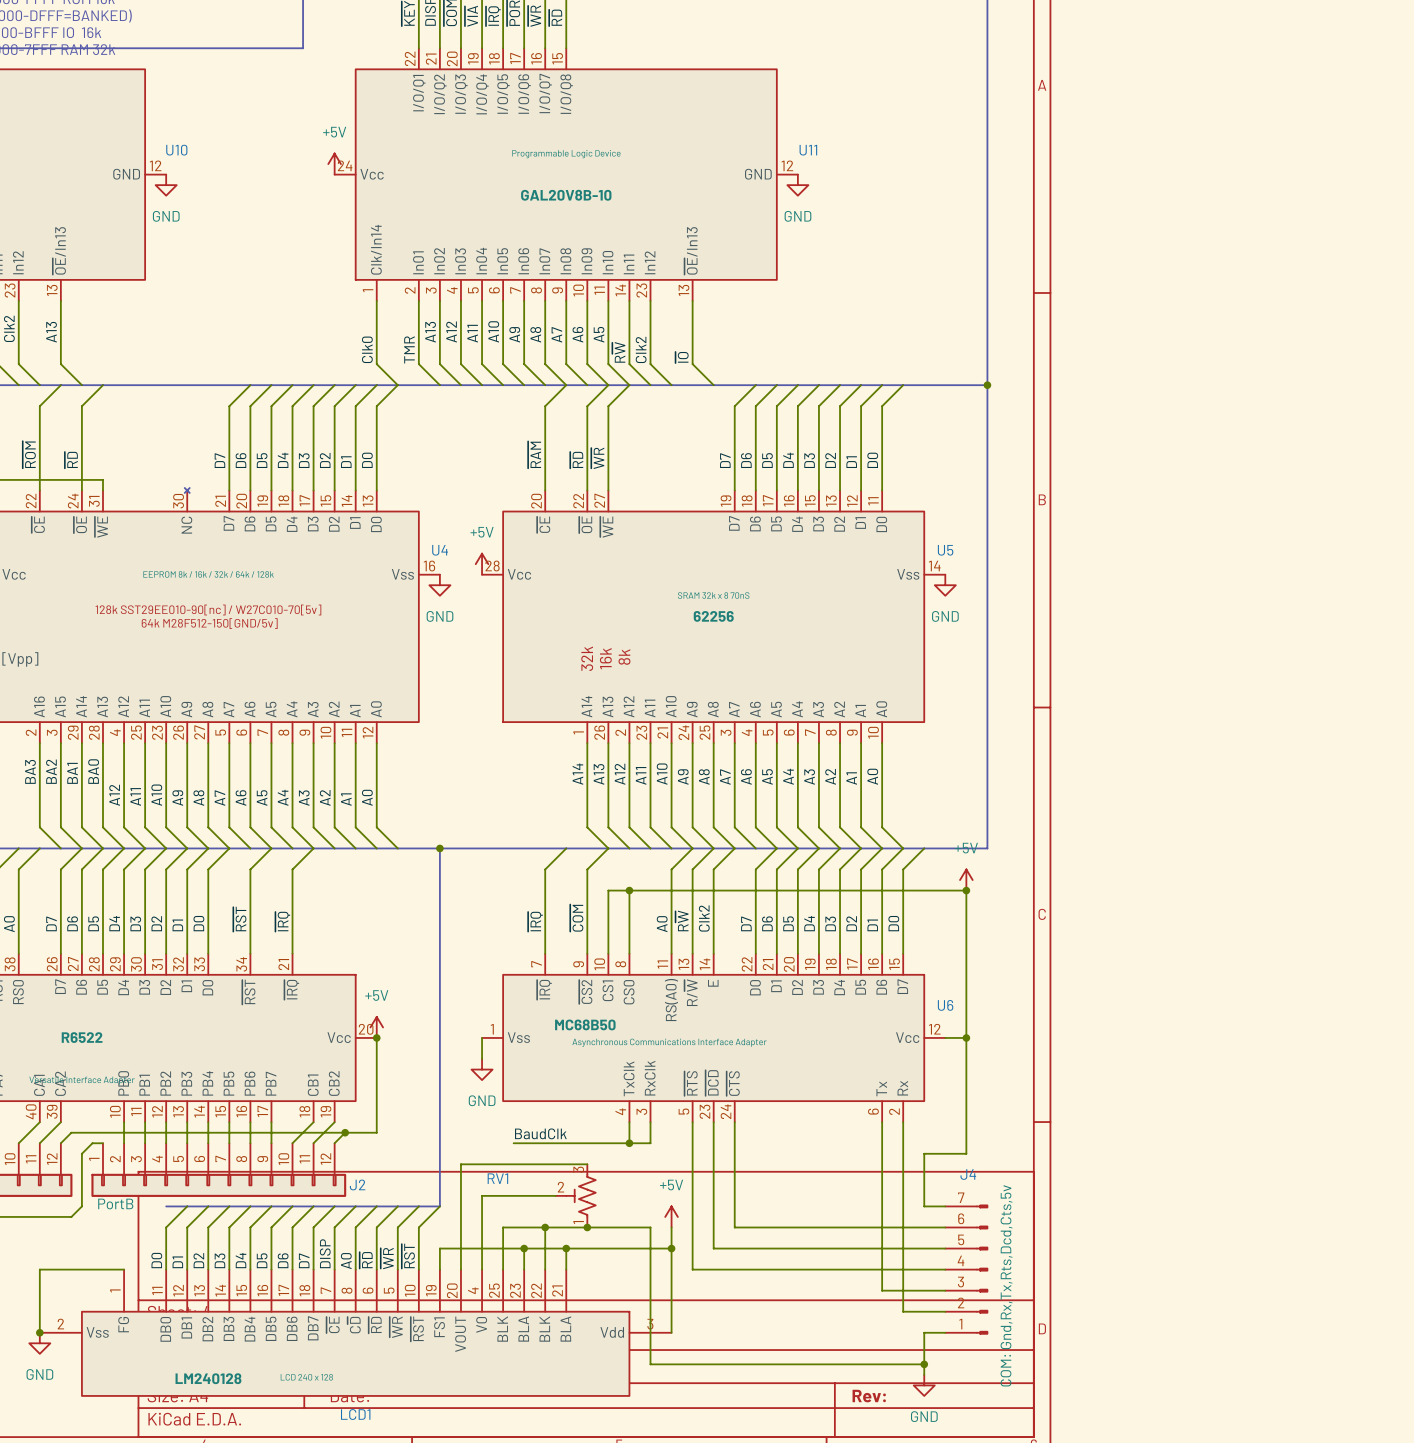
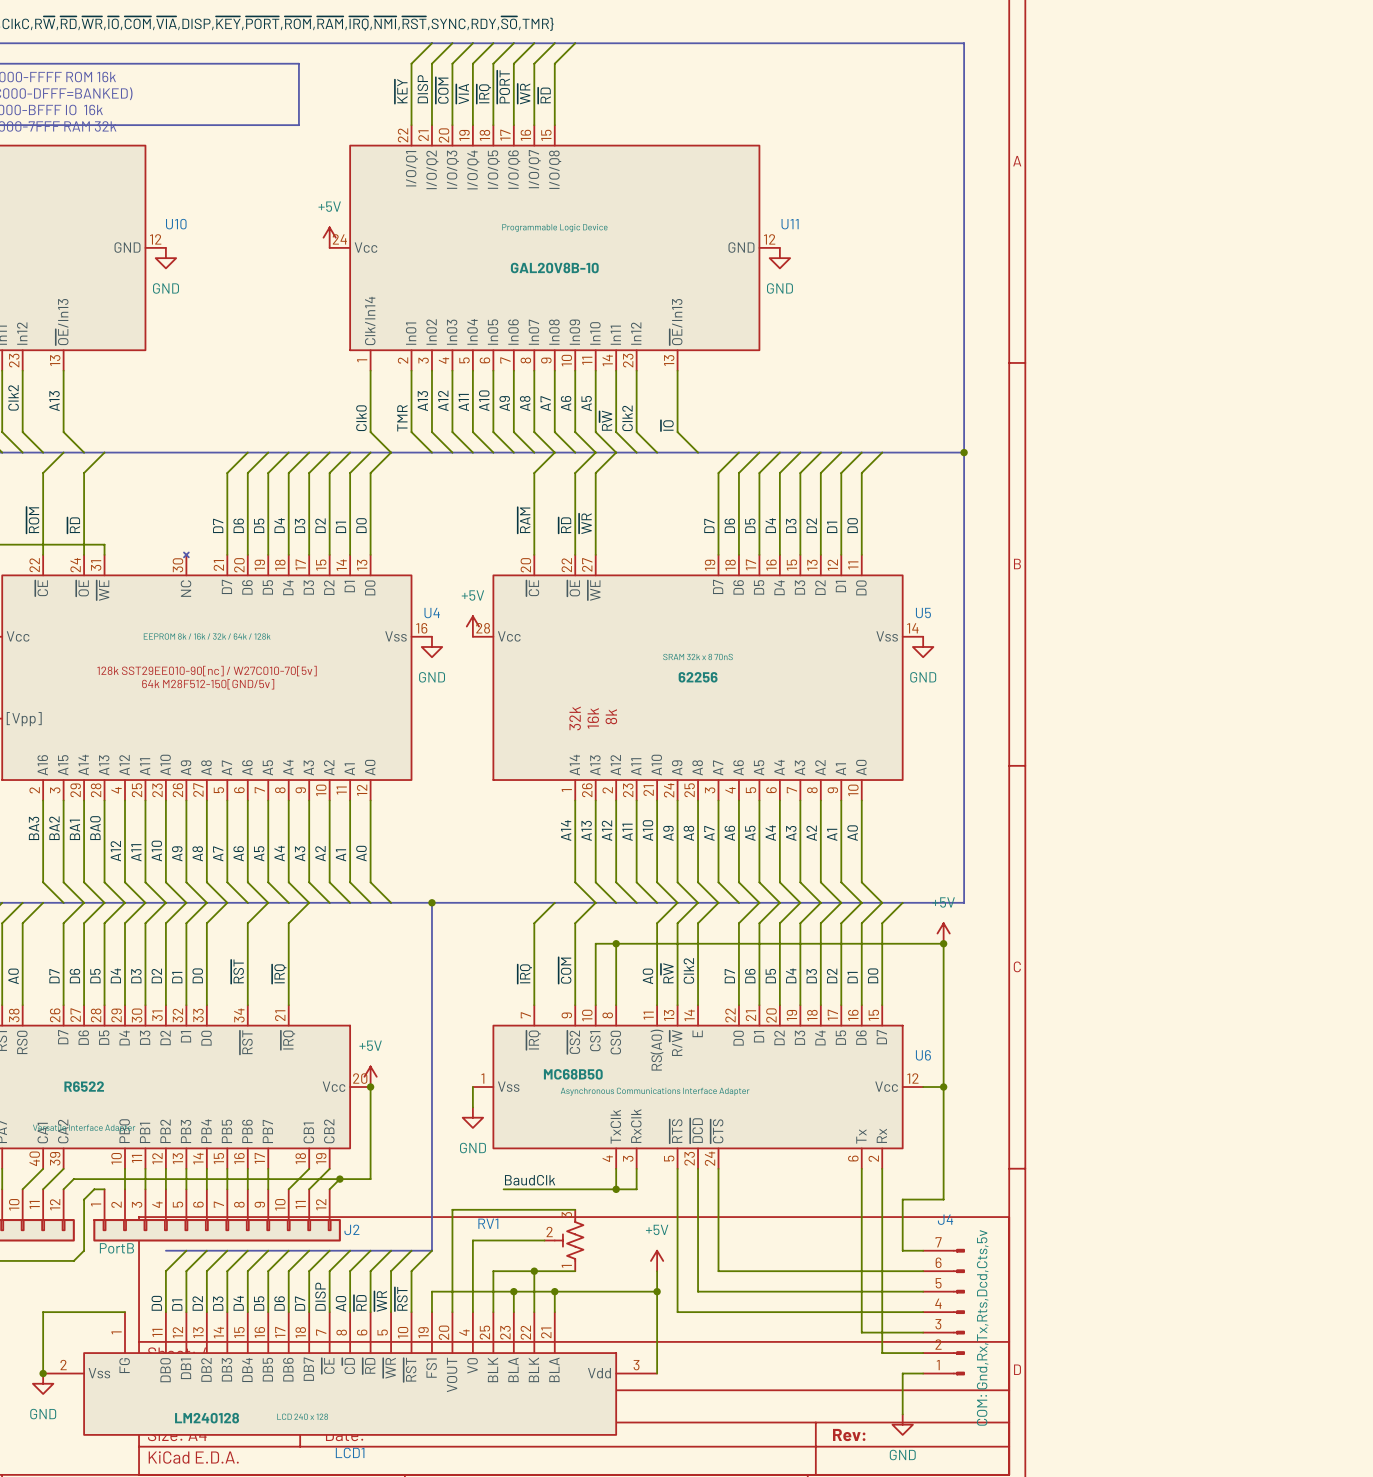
wire: (587, 1227) (650, 1227) (650, 1364) (924, 1364) -> none
junction: (587, 1227) -> none
junction: (924, 1364) -> none

